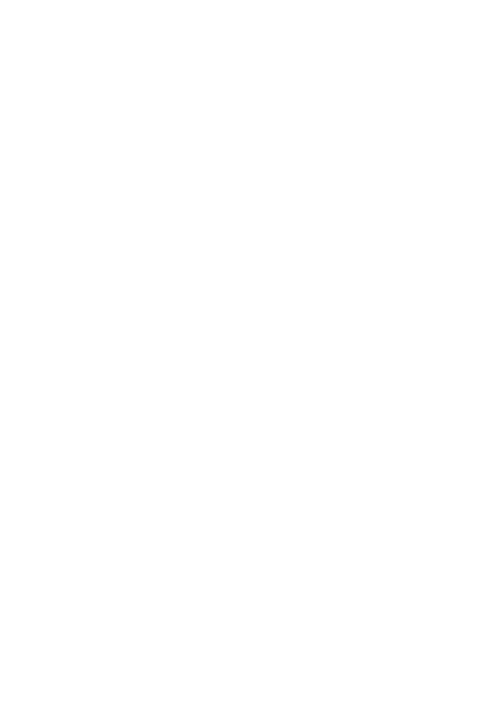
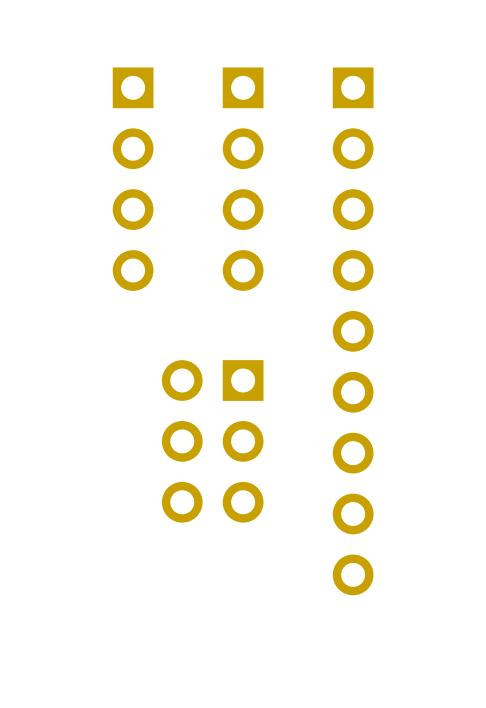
part: none -> (133, 179)
part: none -> (243, 179)
part: none -> (353, 331)
part: none -> (212, 441)

